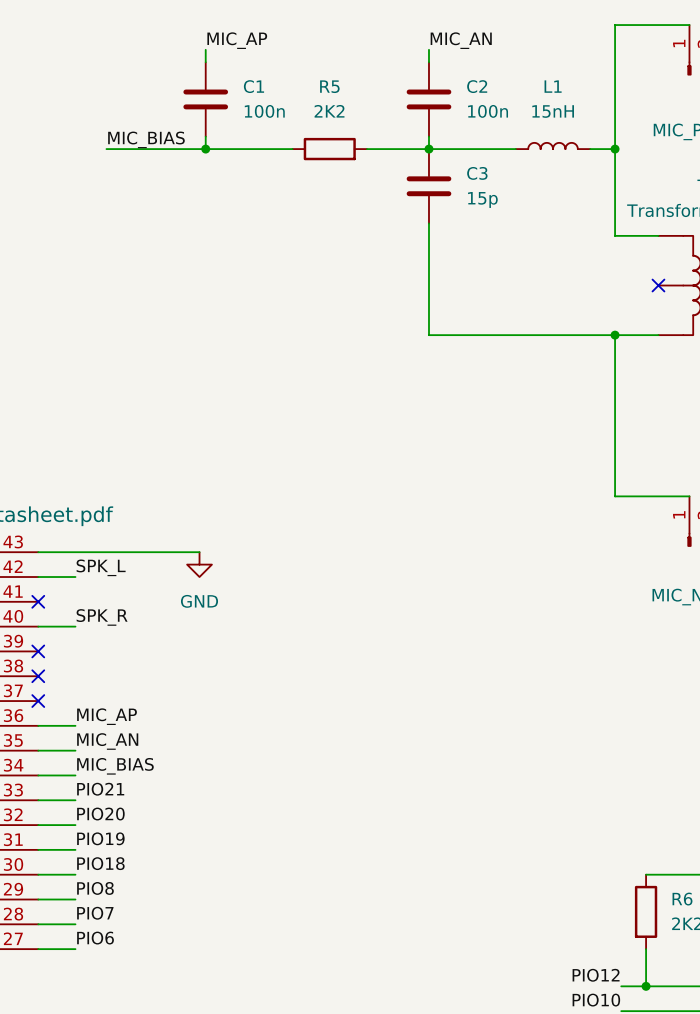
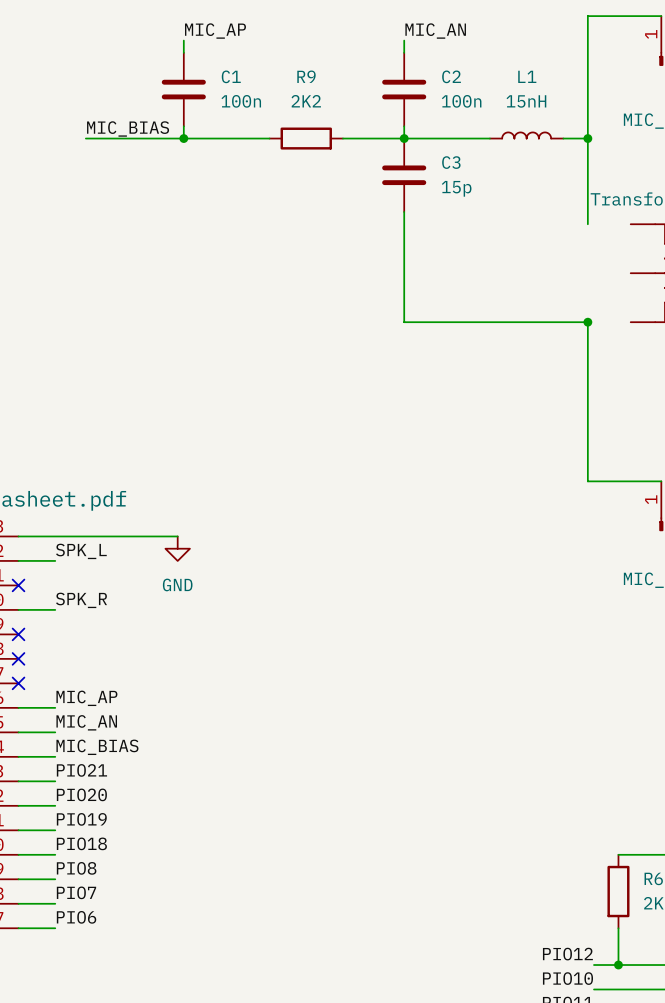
R5 name: R5 (329, 86) -> R9 (306, 76)
wire: (615, 235) (658, 235) -> none
no-connect mark: (658, 285) -> none
wire: (615, 335) (658, 335) -> none

